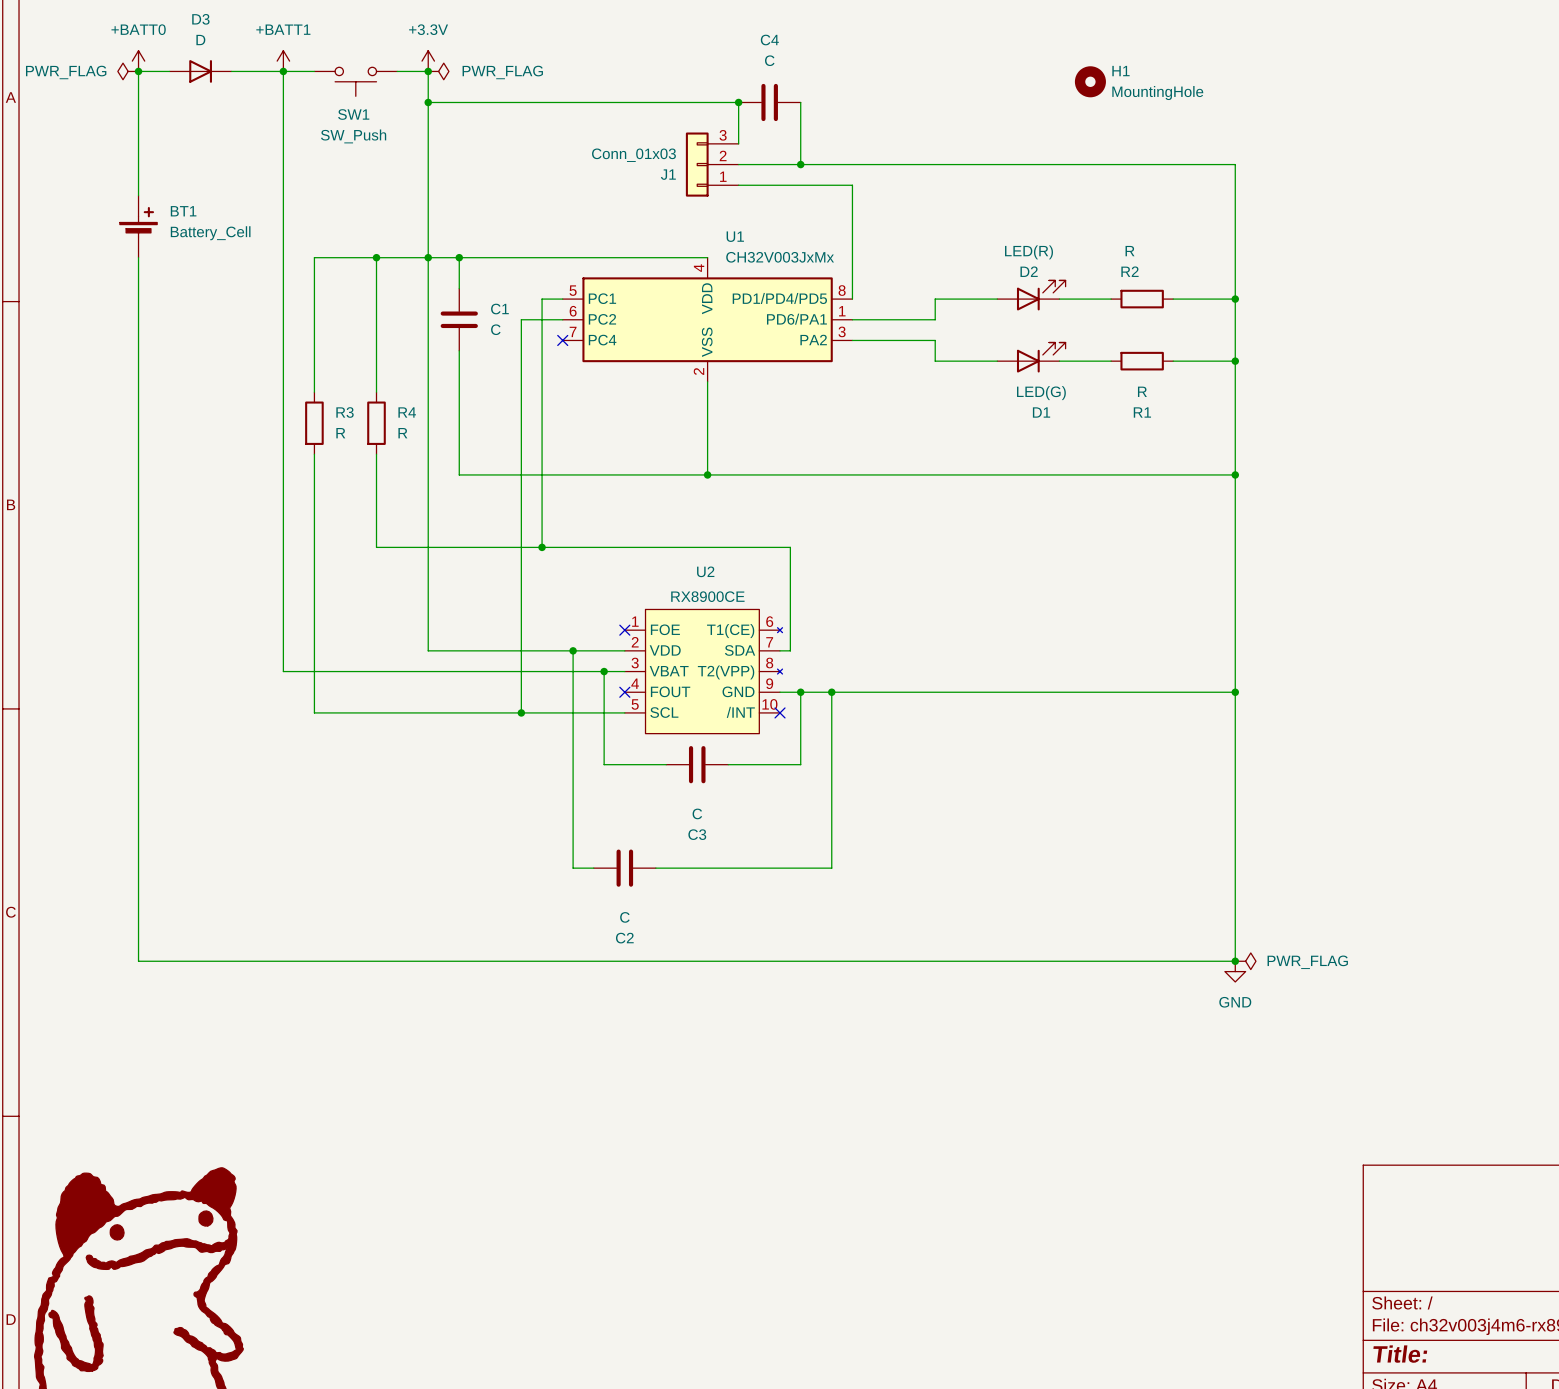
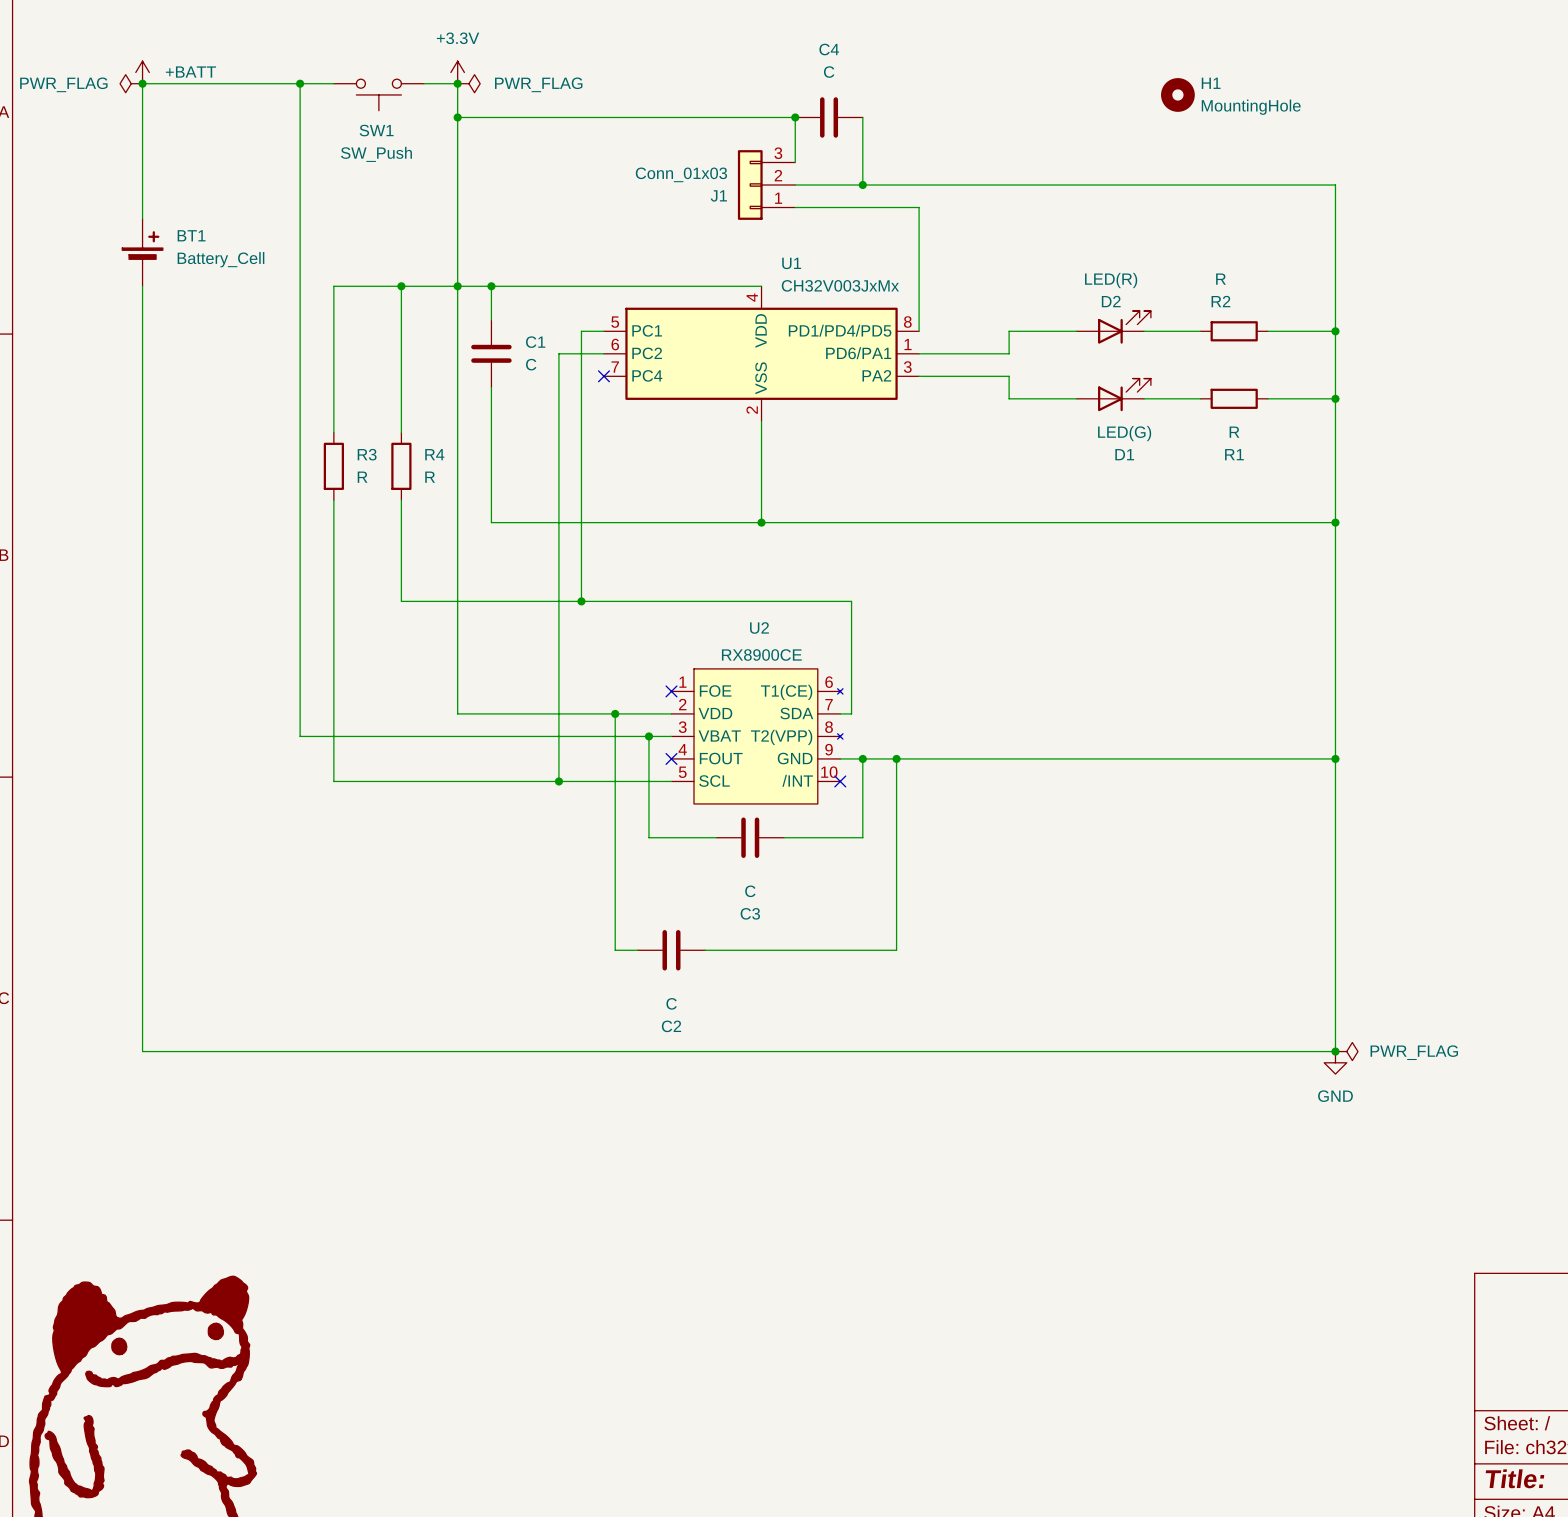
power symbol: +BATT0 (138, 61) -> +BATT (142, 72)
power symbol: +BATT1 (283, 61) -> none
D3: D (200, 71) -> none

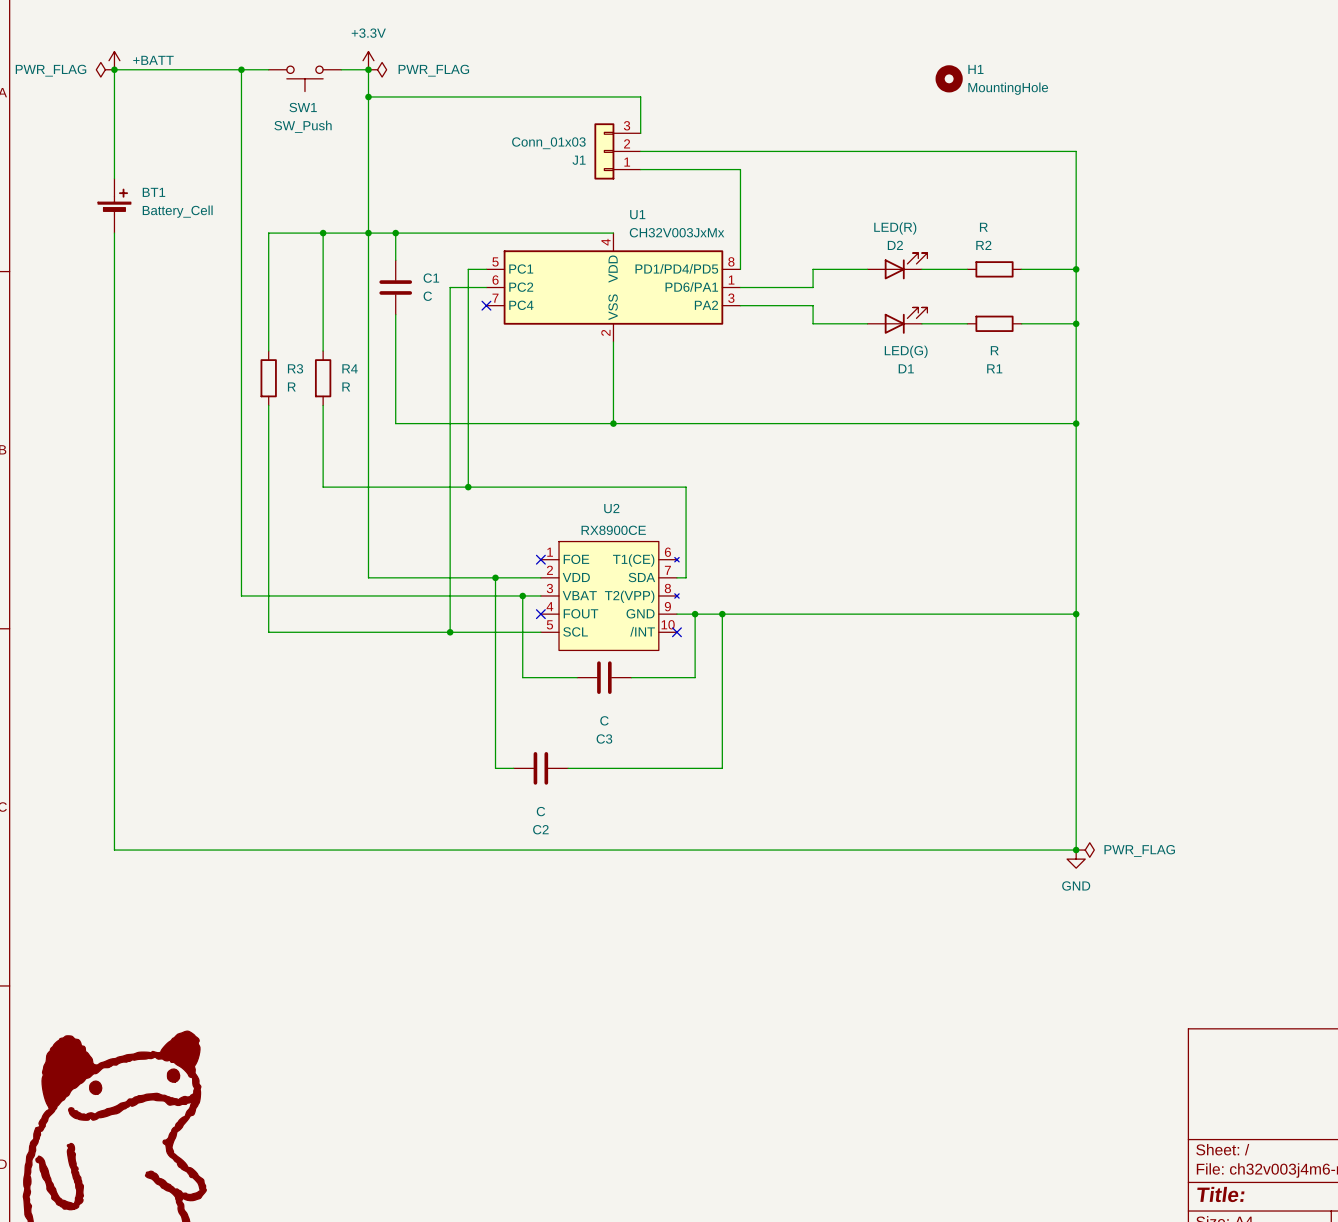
junction: (795, 117) -> none
C4: C (829, 117) -> none
wire: (862, 117) (862, 185) -> none
junction: (862, 185) -> none

